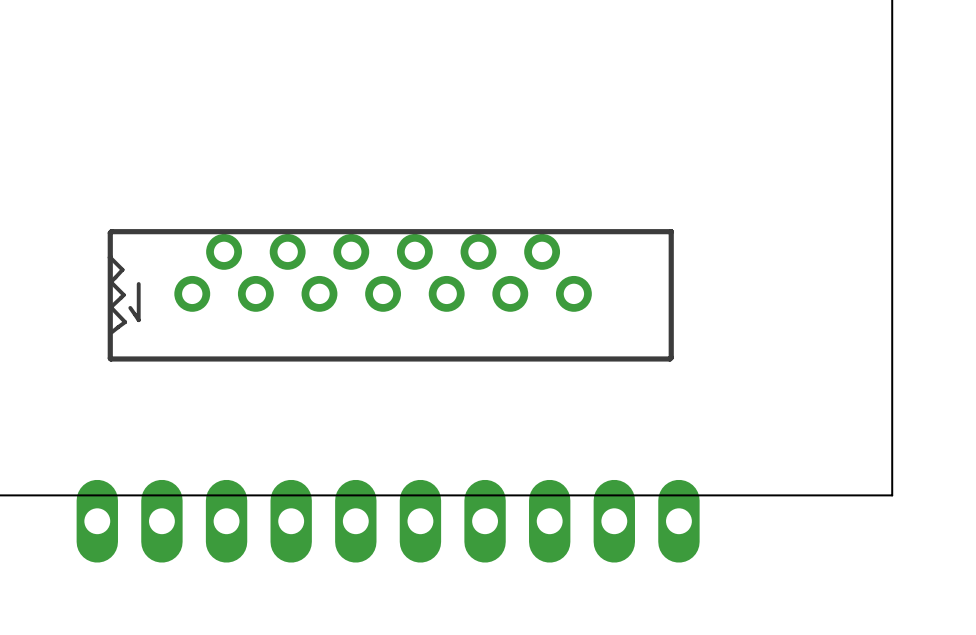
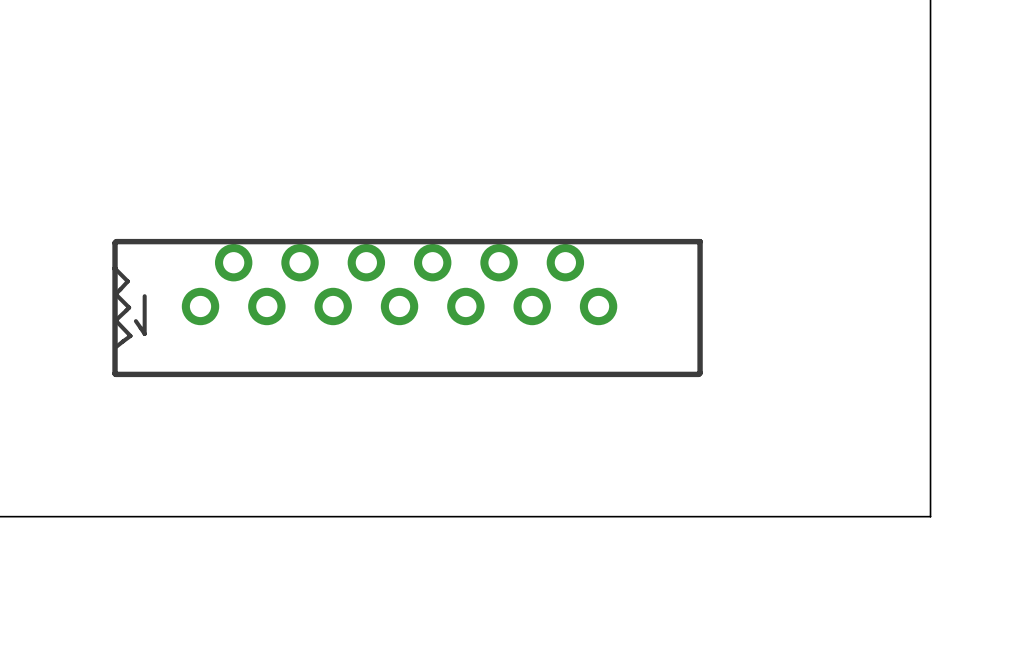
part: (388, 521) -> none

